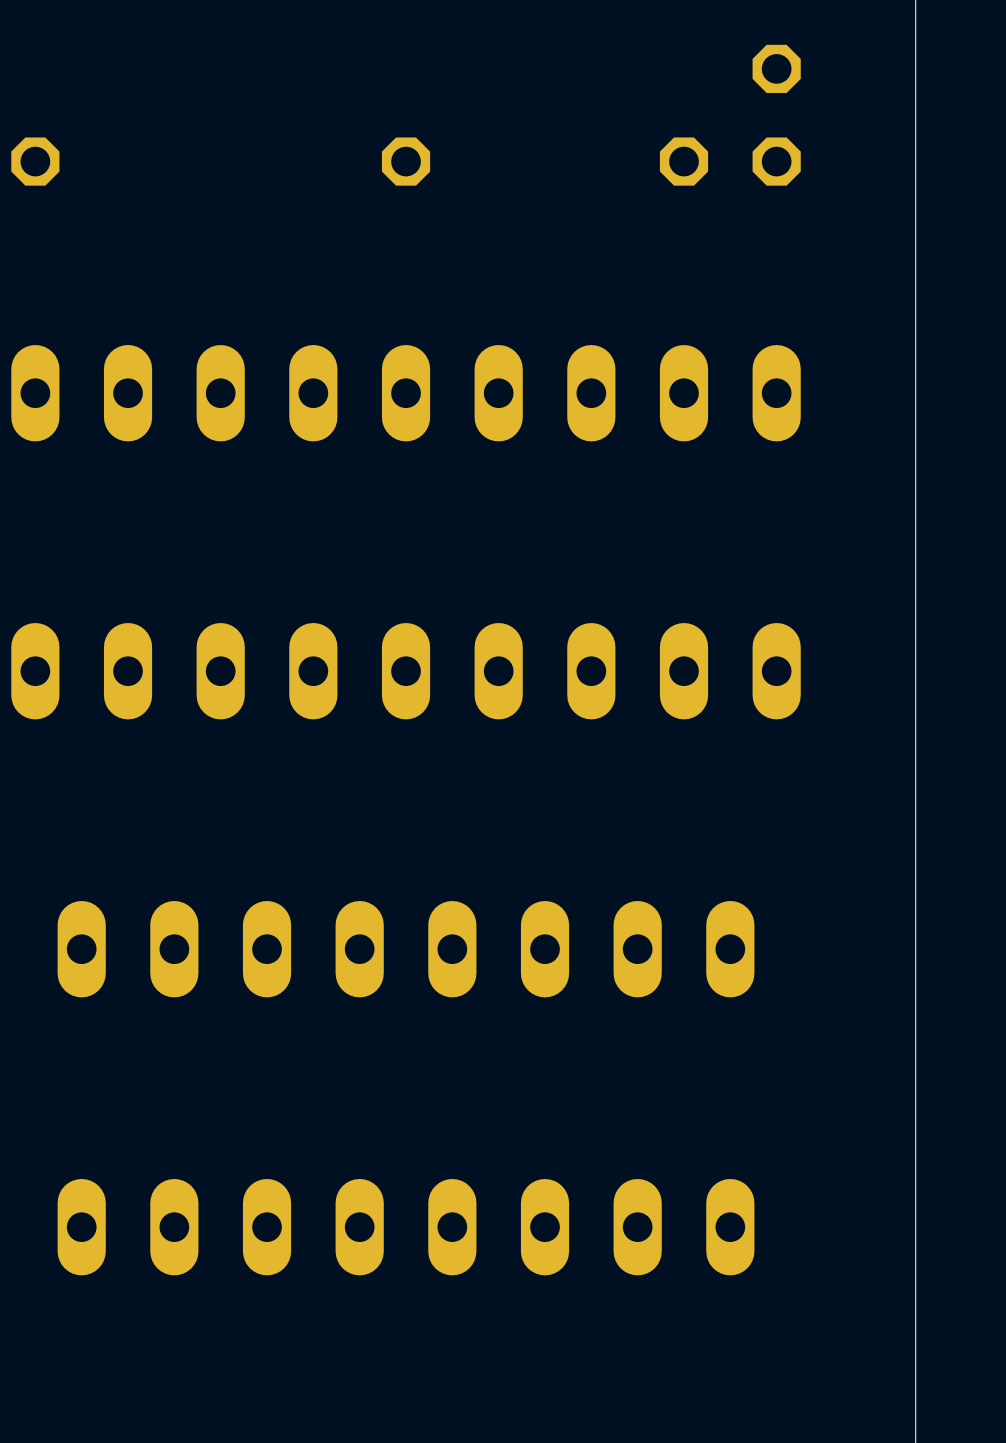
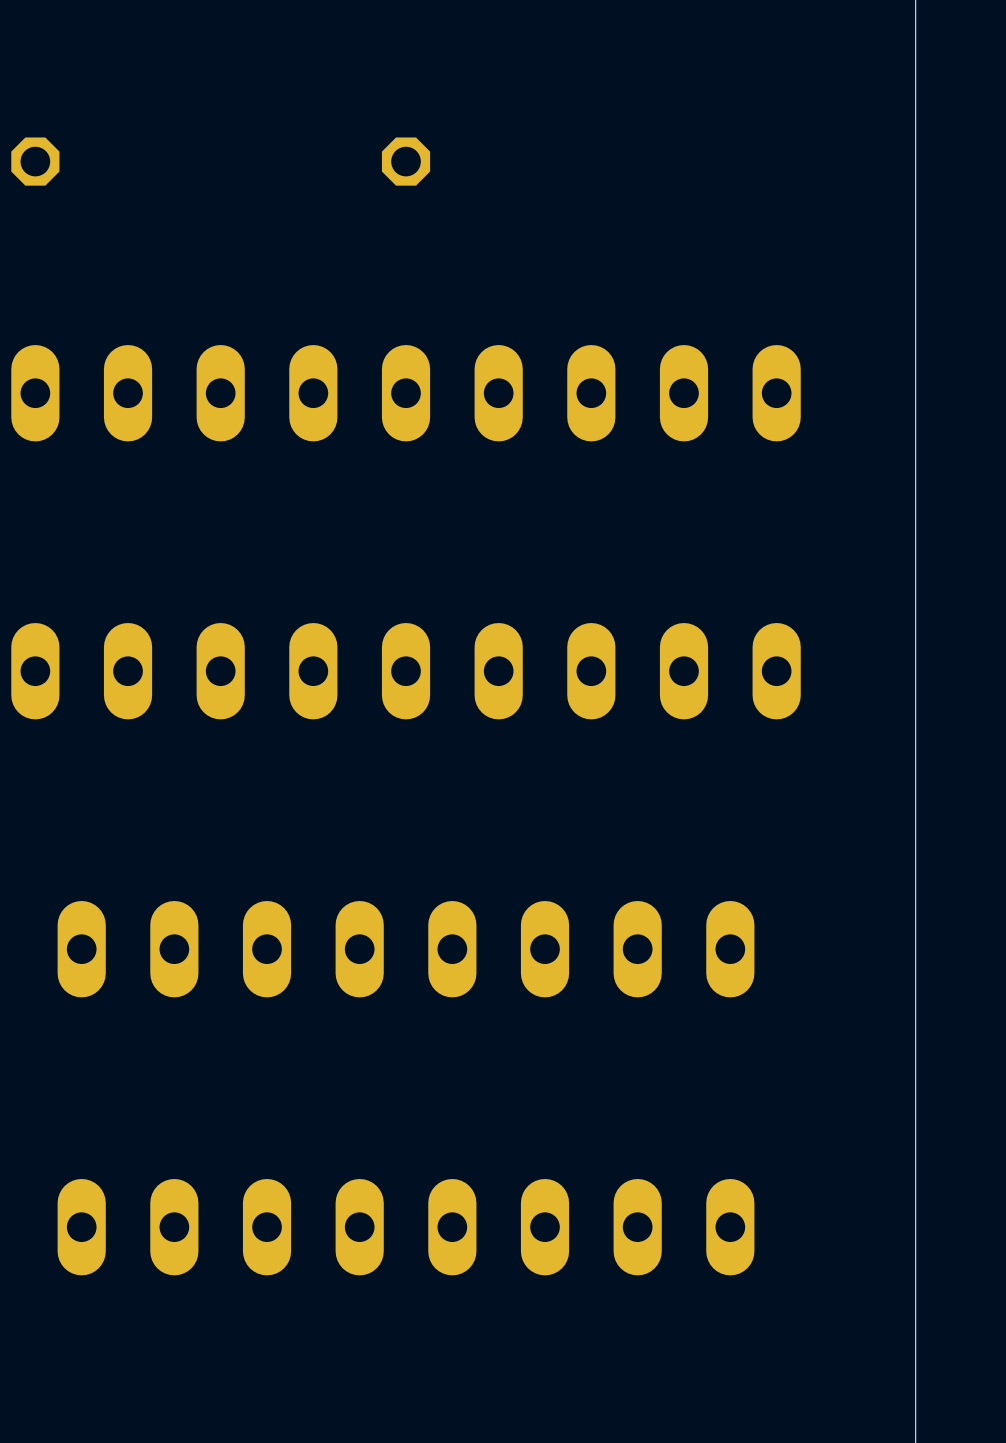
part: (730, 115) -> none

